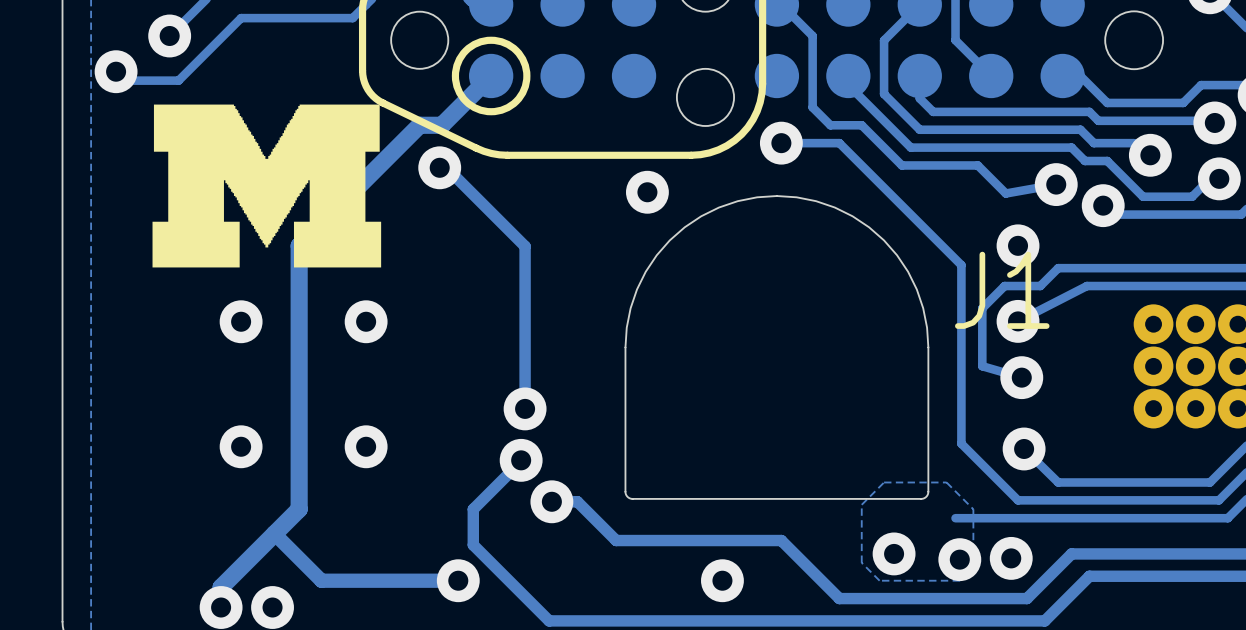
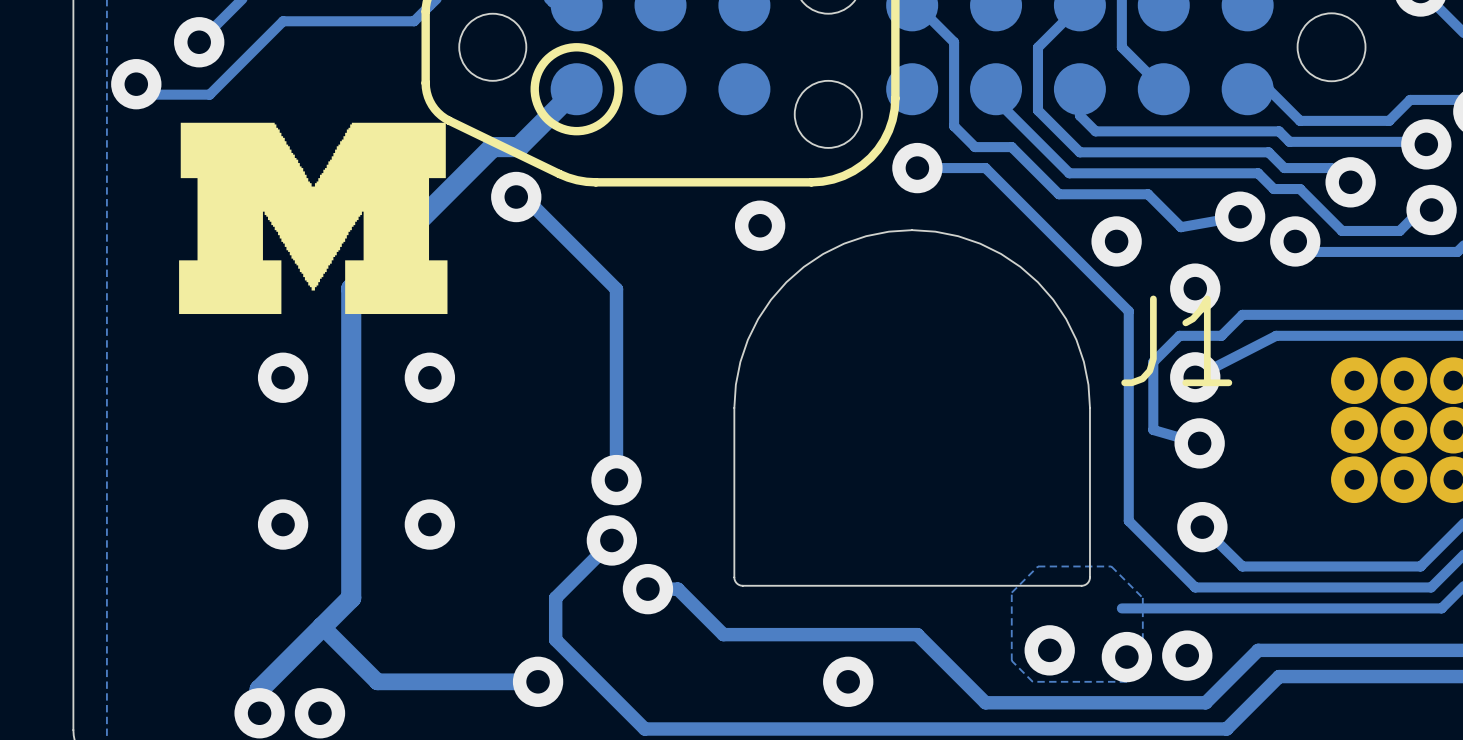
via: none -> (1116, 241)

